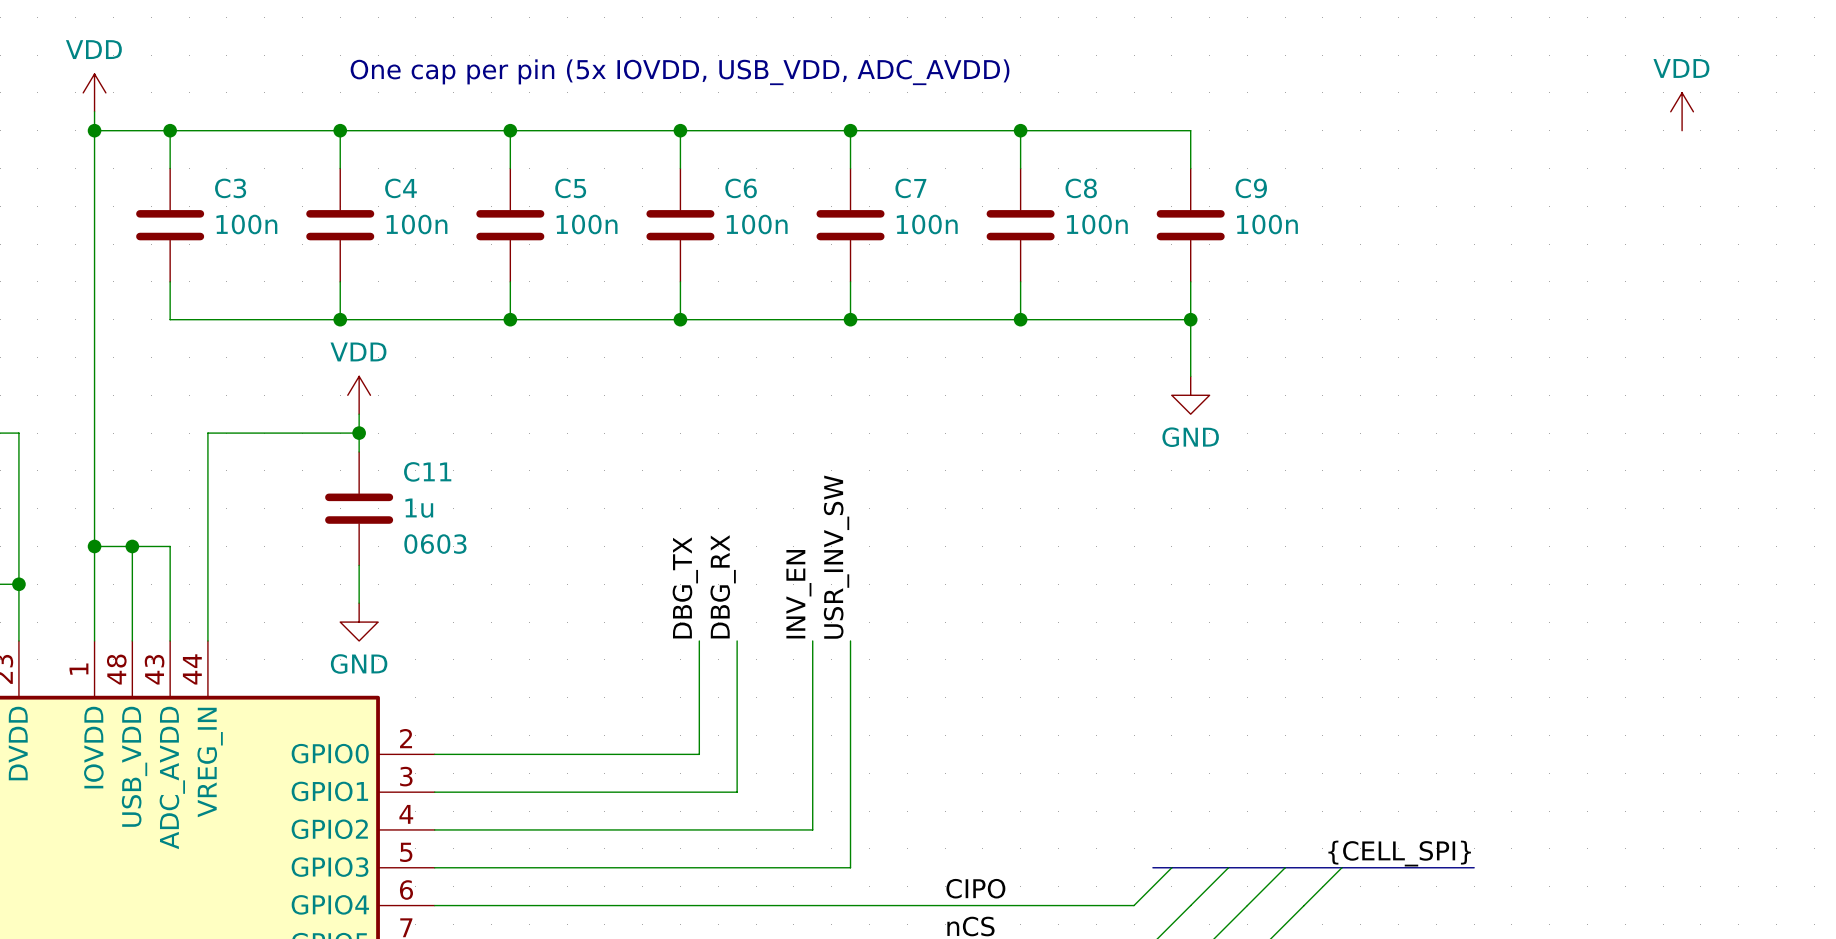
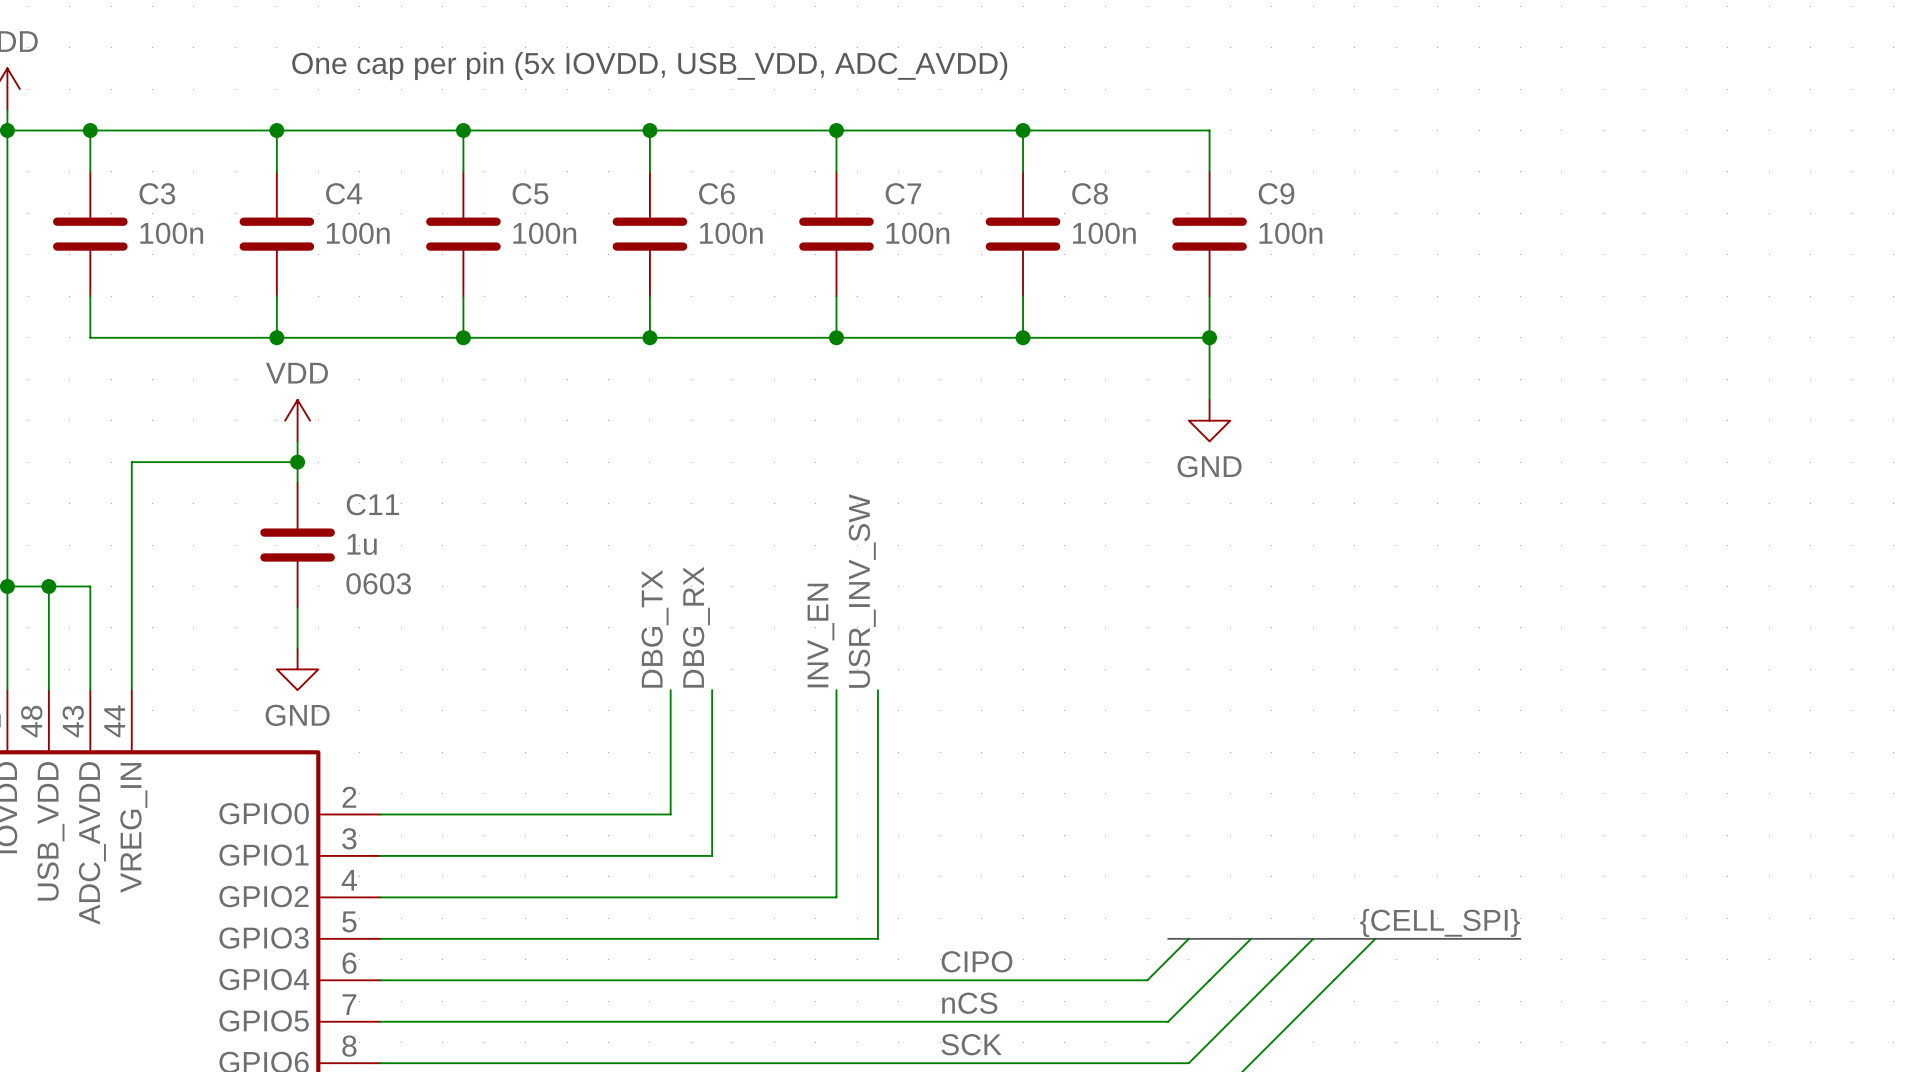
power symbol: VDD (1682, 111) -> none
label: USR_INV_SW (836, 557) -> INV_EN (820, 635)
label: none -> USR_INV_SW (862, 591)
label: INV_EN (798, 594) -> none
wire: (812, 640) (812, 829) -> none
wire: none -> (877, 690) (877, 938) (836, 938)
wire: (850, 829) (850, 867) -> (836, 897) (795, 897)

